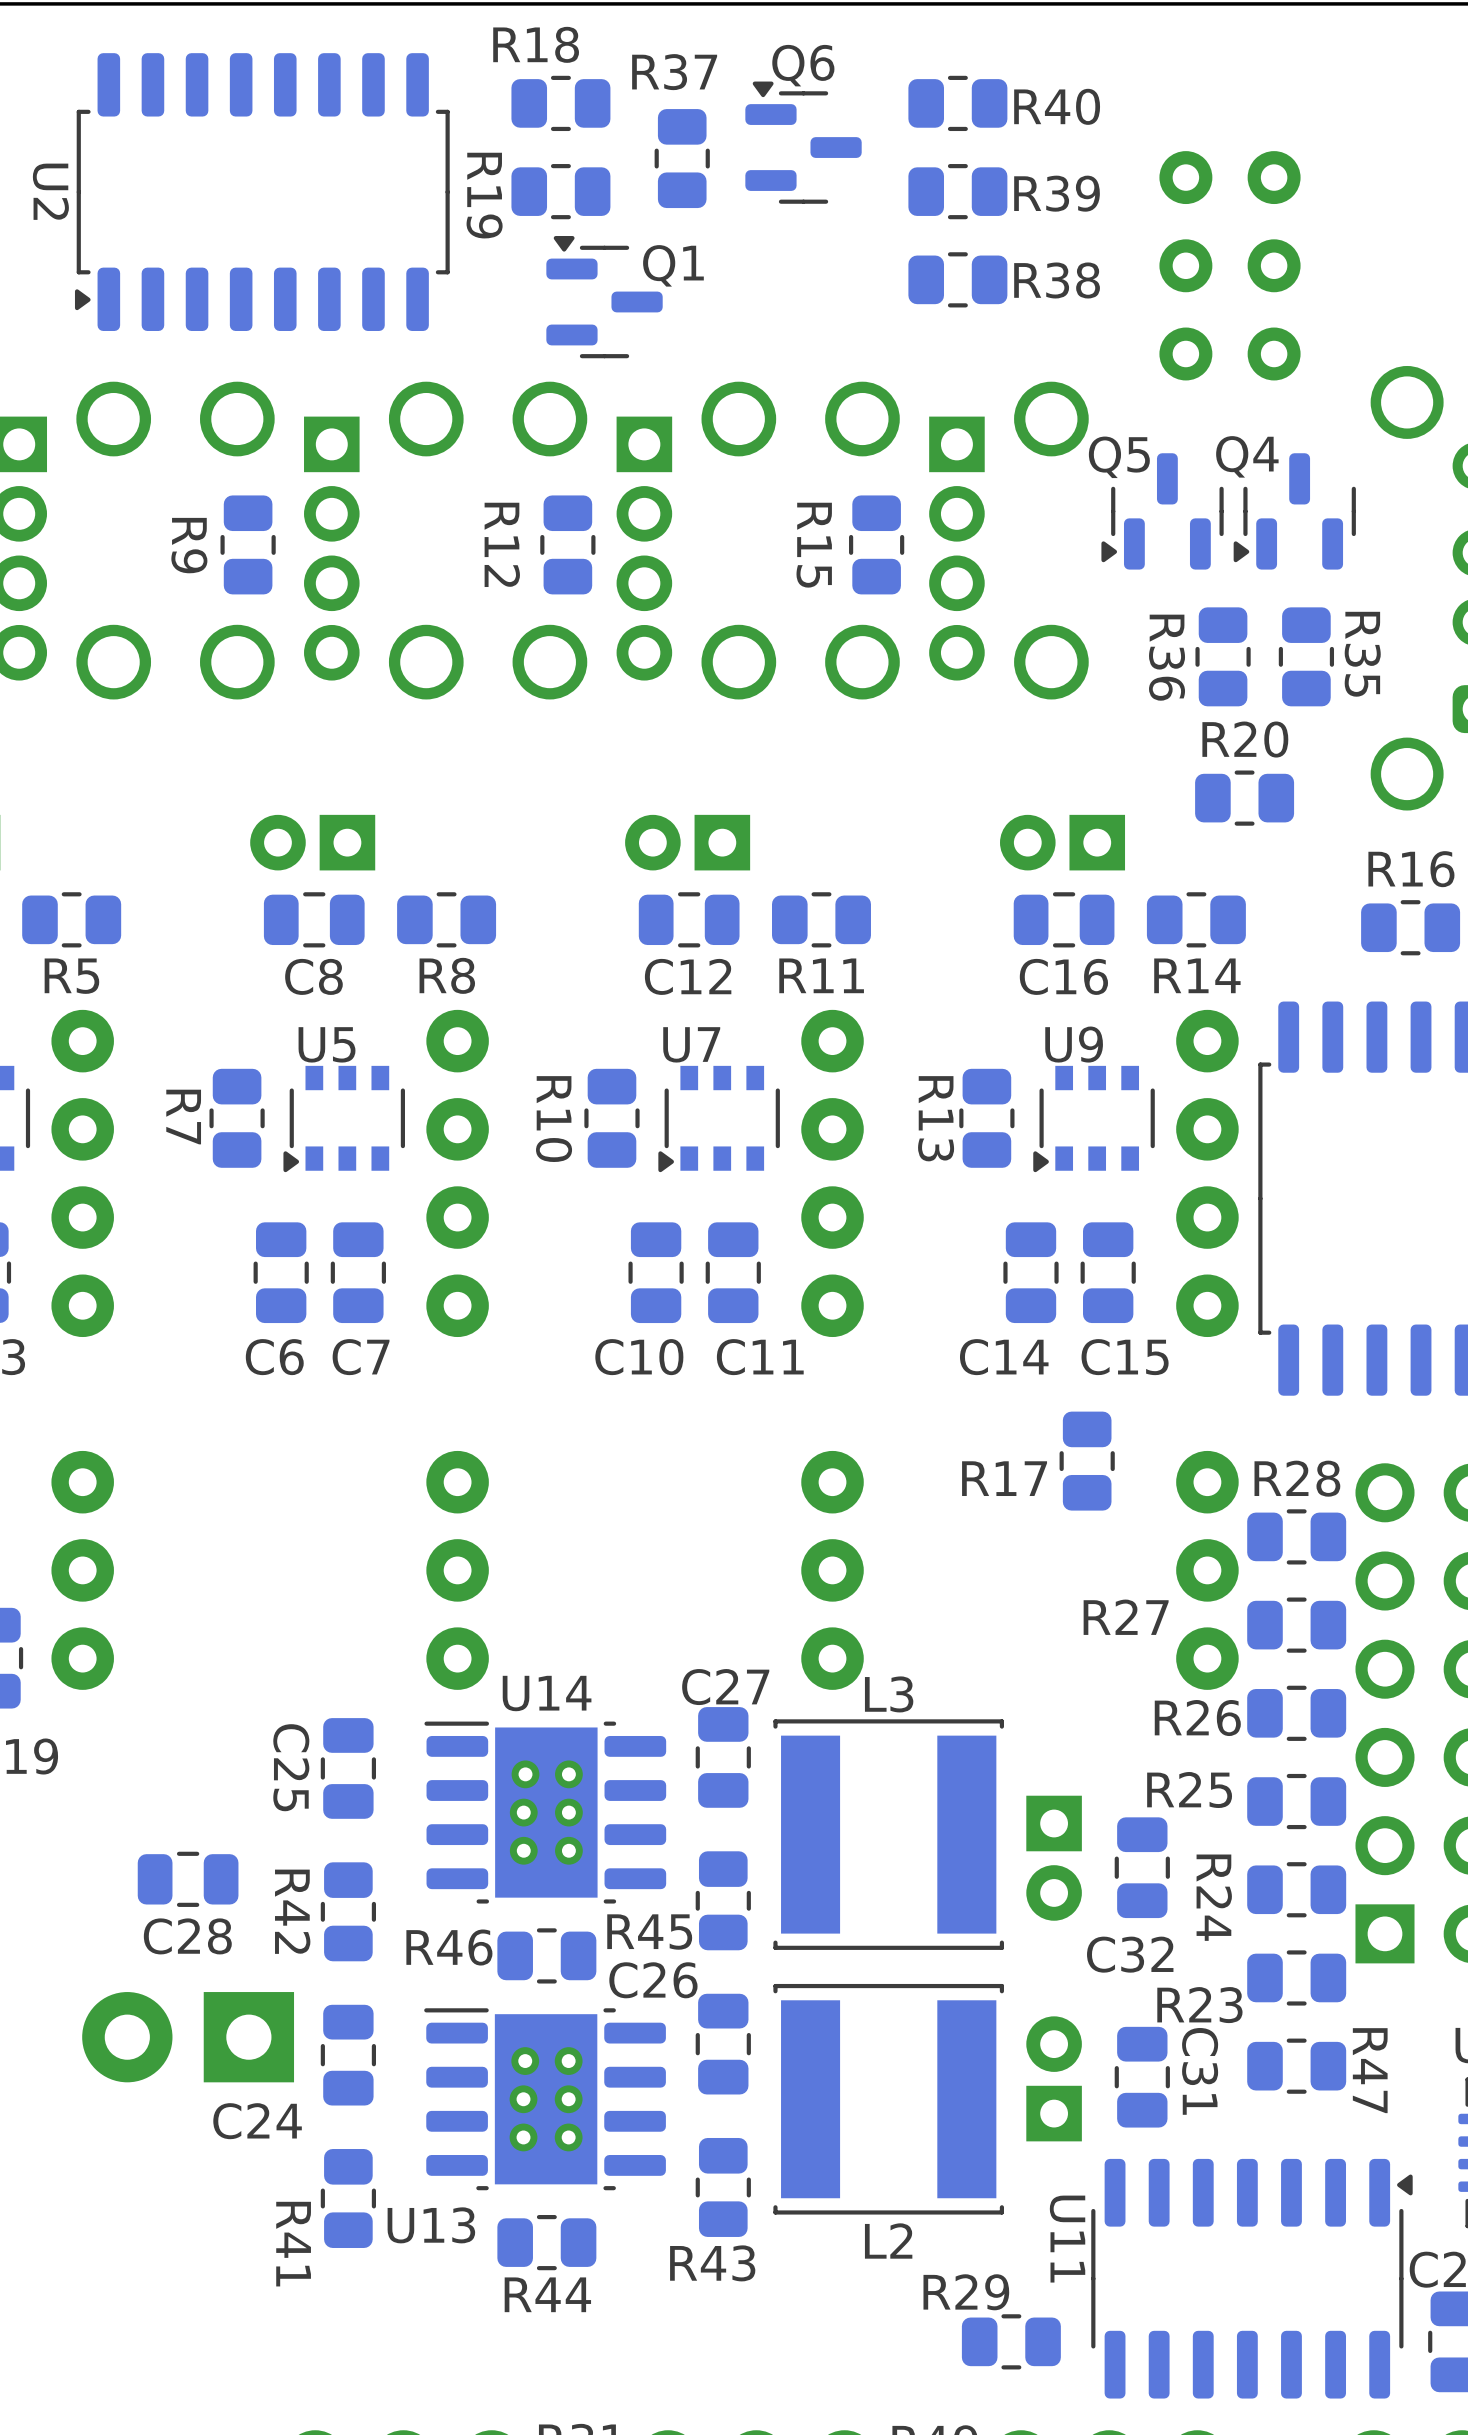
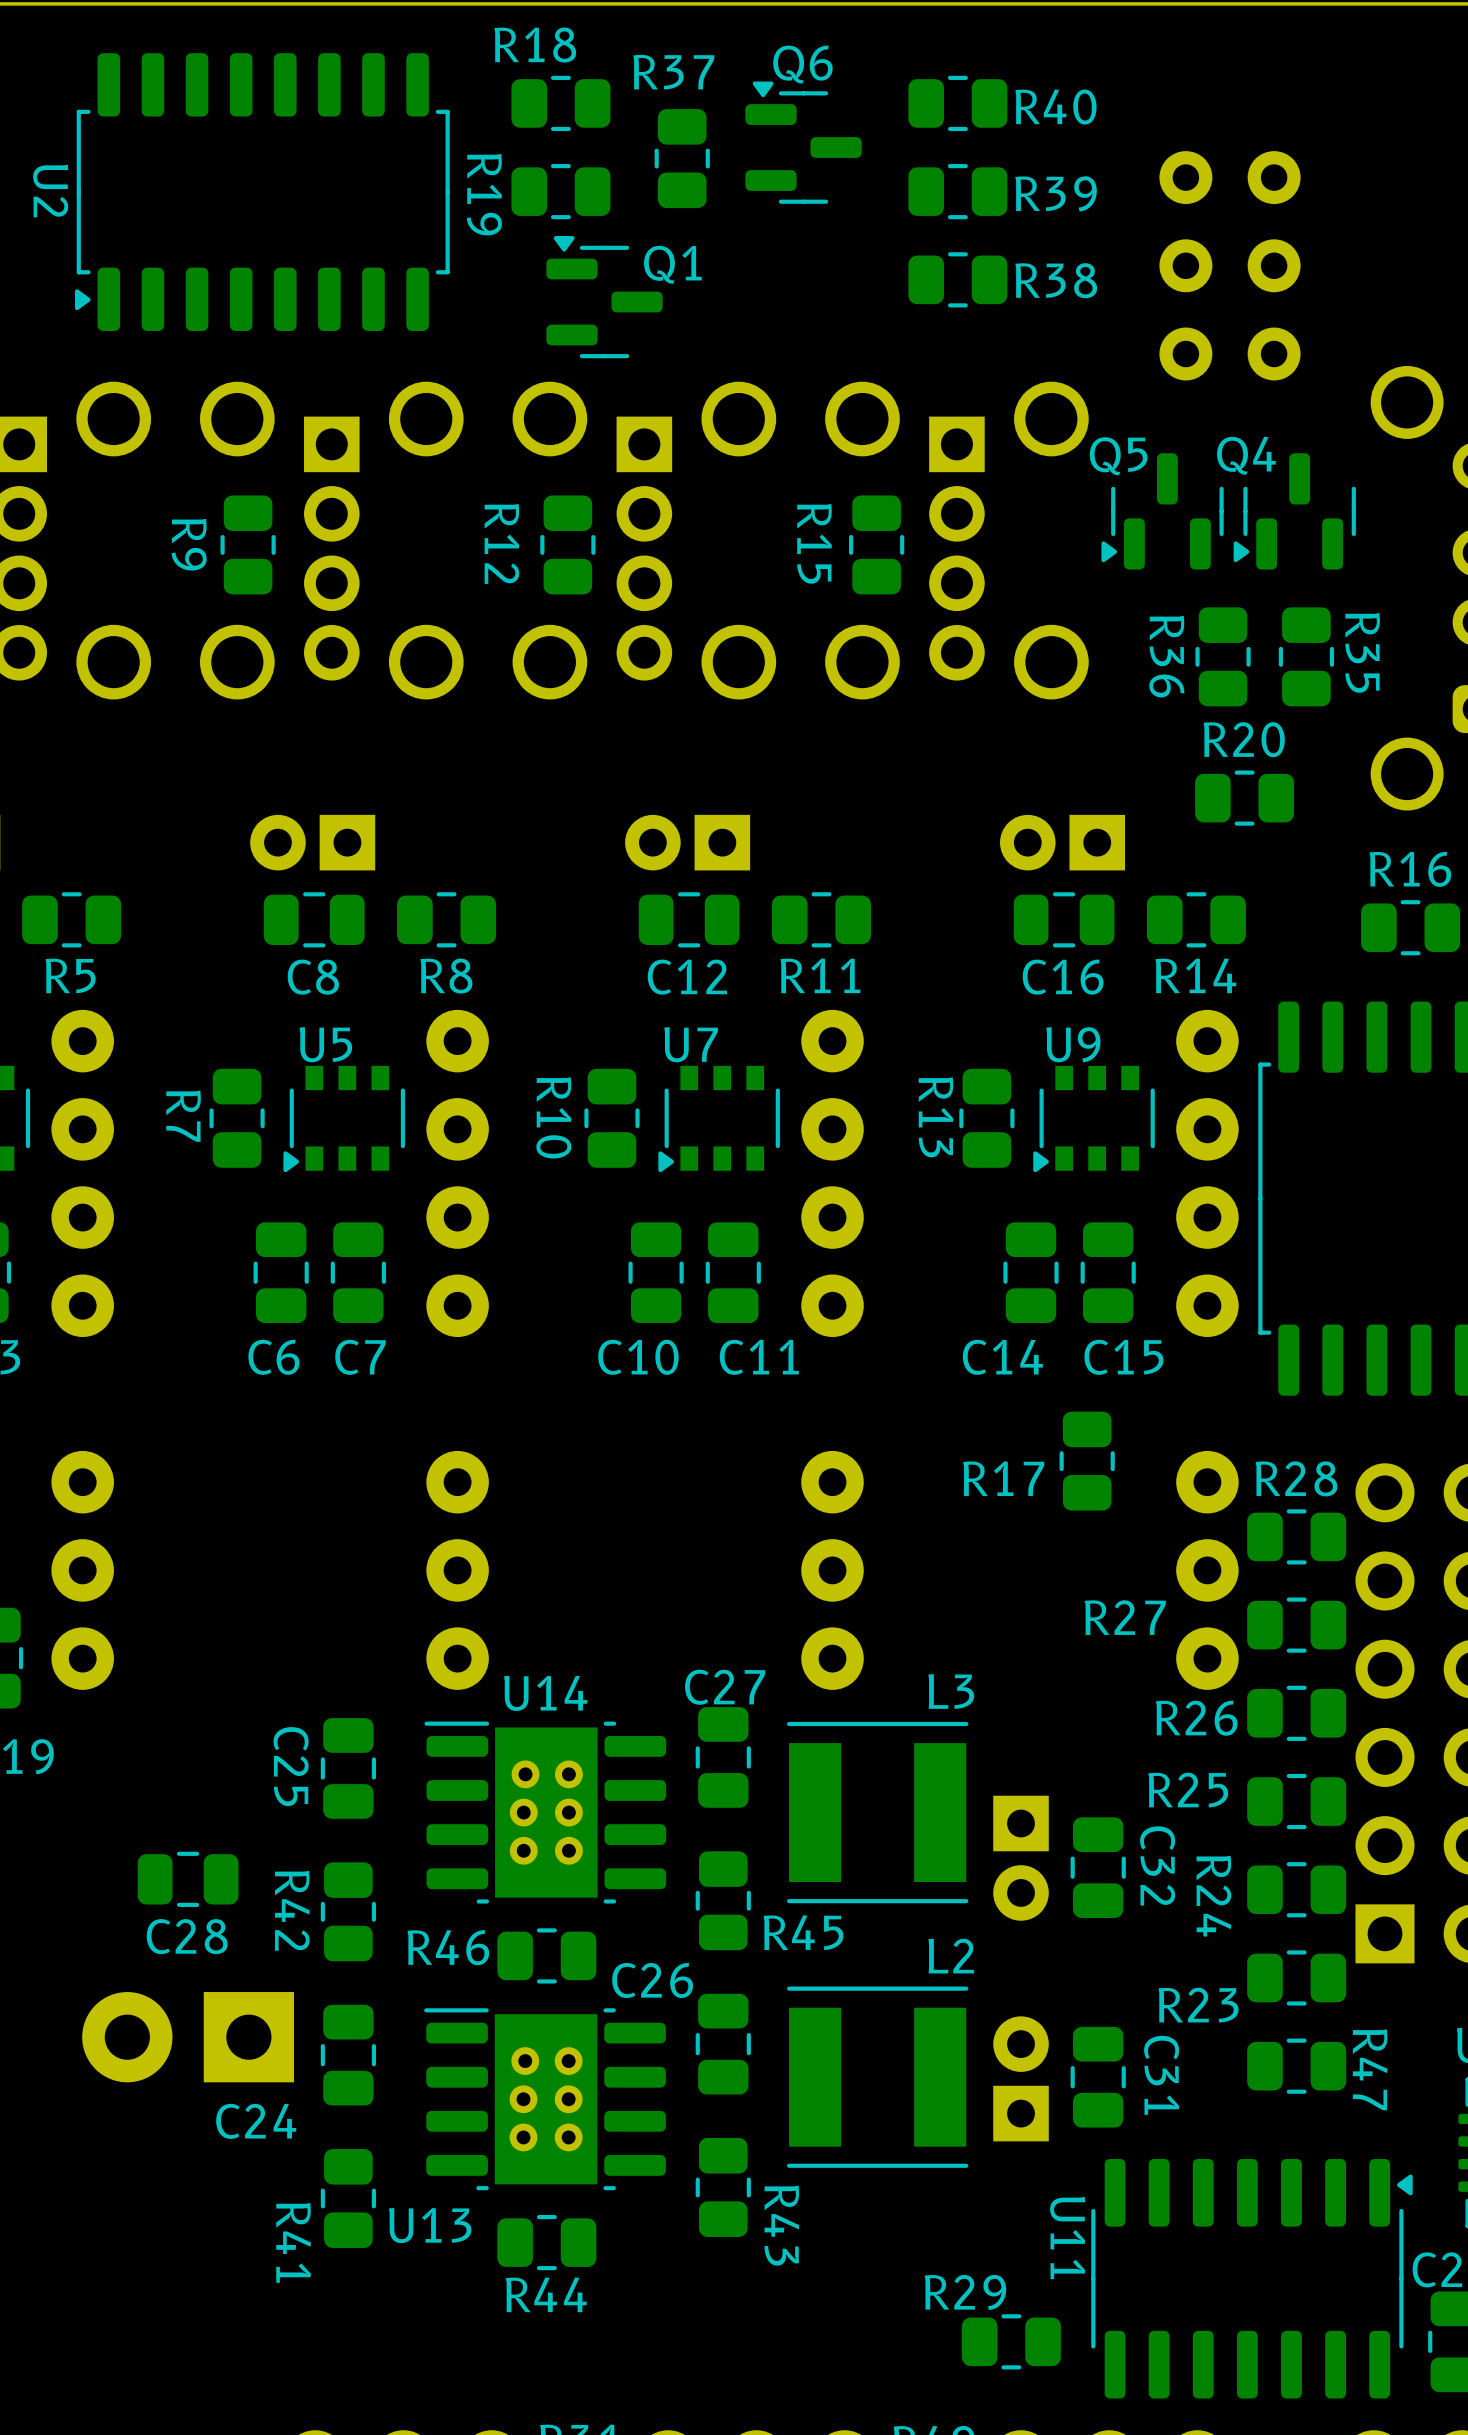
L3 name position: L3 (889, 1694) -> L3 (951, 1691)
L3 footprint: [773, 1719, 1004, 1950] -> [787, 1721, 969, 1904]
part position: (1054, 1858) -> (1021, 1858)
C32 position: (1142, 1867) -> (1098, 1867)
R45 name position: R45 (649, 1932) -> R45 (803, 1932)
C32 name rotation: 0° (1130, 1954) -> 90° clockwise (1157, 1865)
L2 footprint: [773, 1983, 1004, 2215] -> [787, 1986, 969, 2168]
C31 name position: C31 (1200, 2071) -> C31 (1161, 2075)
C31 position: (1142, 2077) -> (1098, 2077)
part position: (1054, 2078) -> (1021, 2078)
L2 name position: L2 (888, 2240) -> L2 (951, 1956)
R43 name rotation: 0° (712, 2263) -> 90° clockwise (781, 2225)

